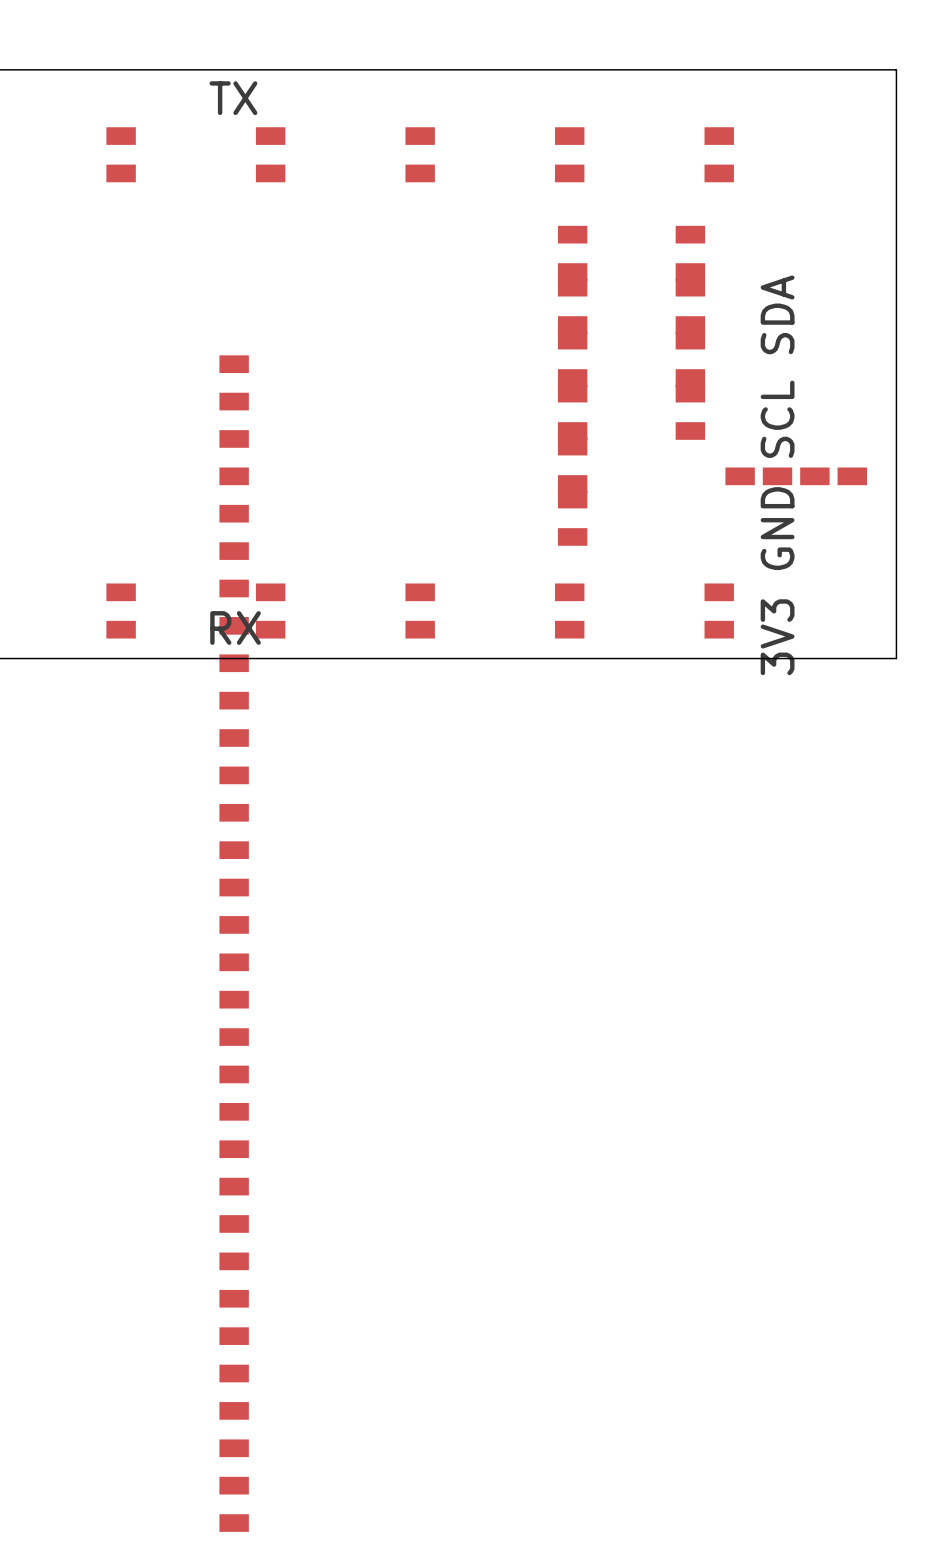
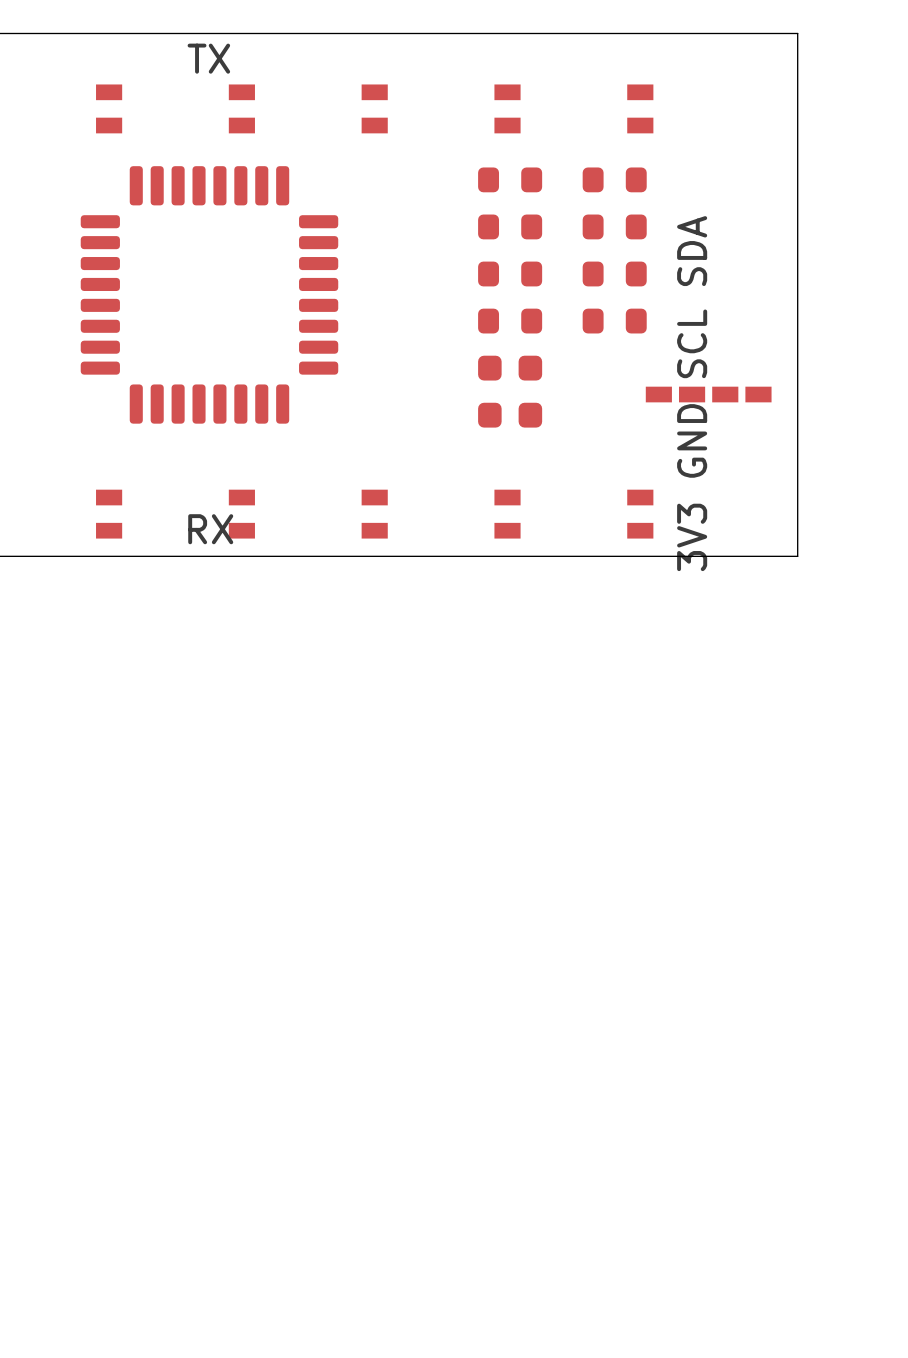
part: none -> (510, 179)
part: none -> (614, 179)
part: (572, 253) -> none
part: (690, 253) -> none
part: none -> (510, 226)
part: none -> (614, 226)
part: (572, 306) -> none
part: (690, 306) -> none
part: none -> (510, 274)
part: none -> (614, 274)
part: (572, 359) -> none
part: (690, 359) -> none
part: none -> (209, 294)
part: none -> (510, 321)
part: none -> (614, 321)
part: (572, 412) -> none
part: (690, 412) -> none
part: none -> (510, 368)
part: (572, 465) -> none
part: none -> (510, 415)
part: (572, 518) -> none
part: (234, 943) -> none

